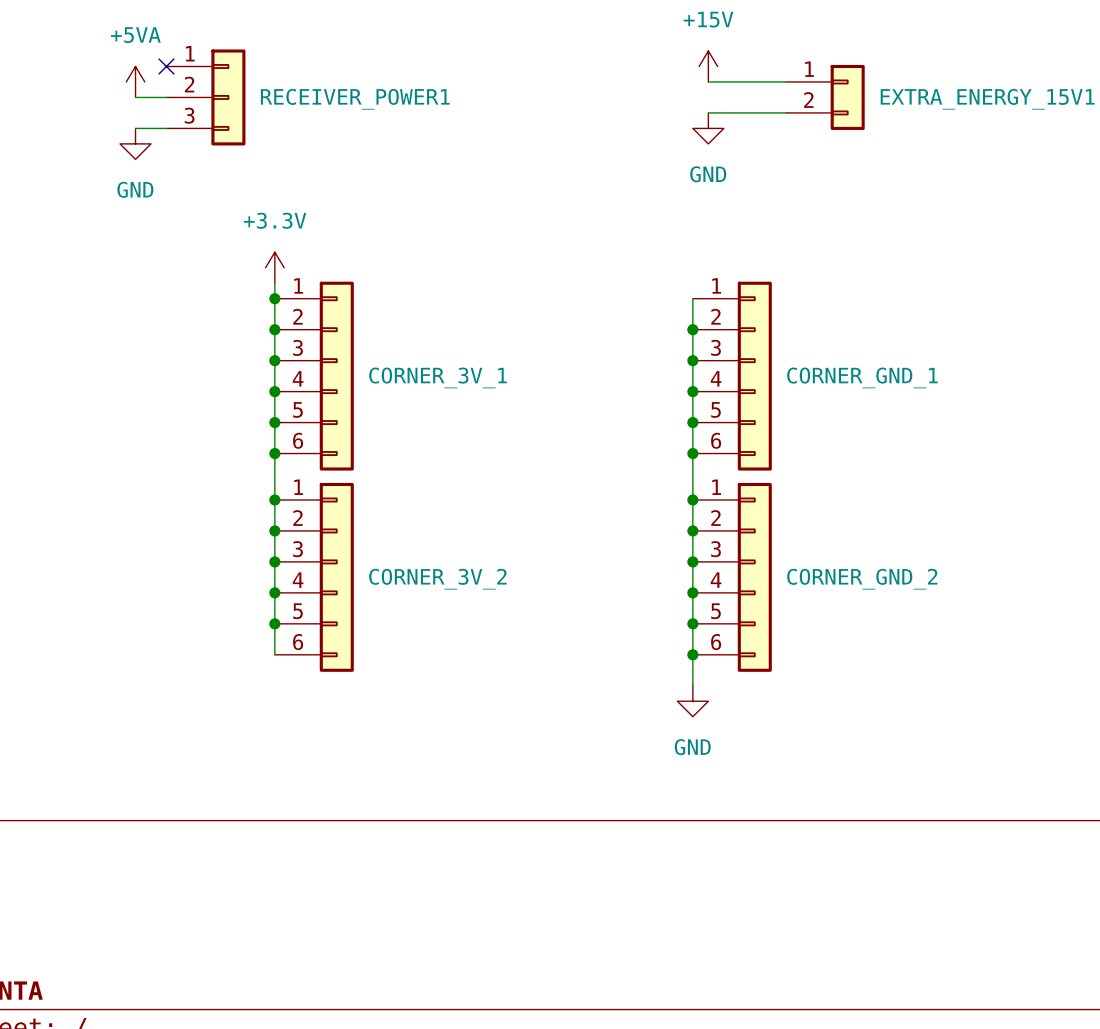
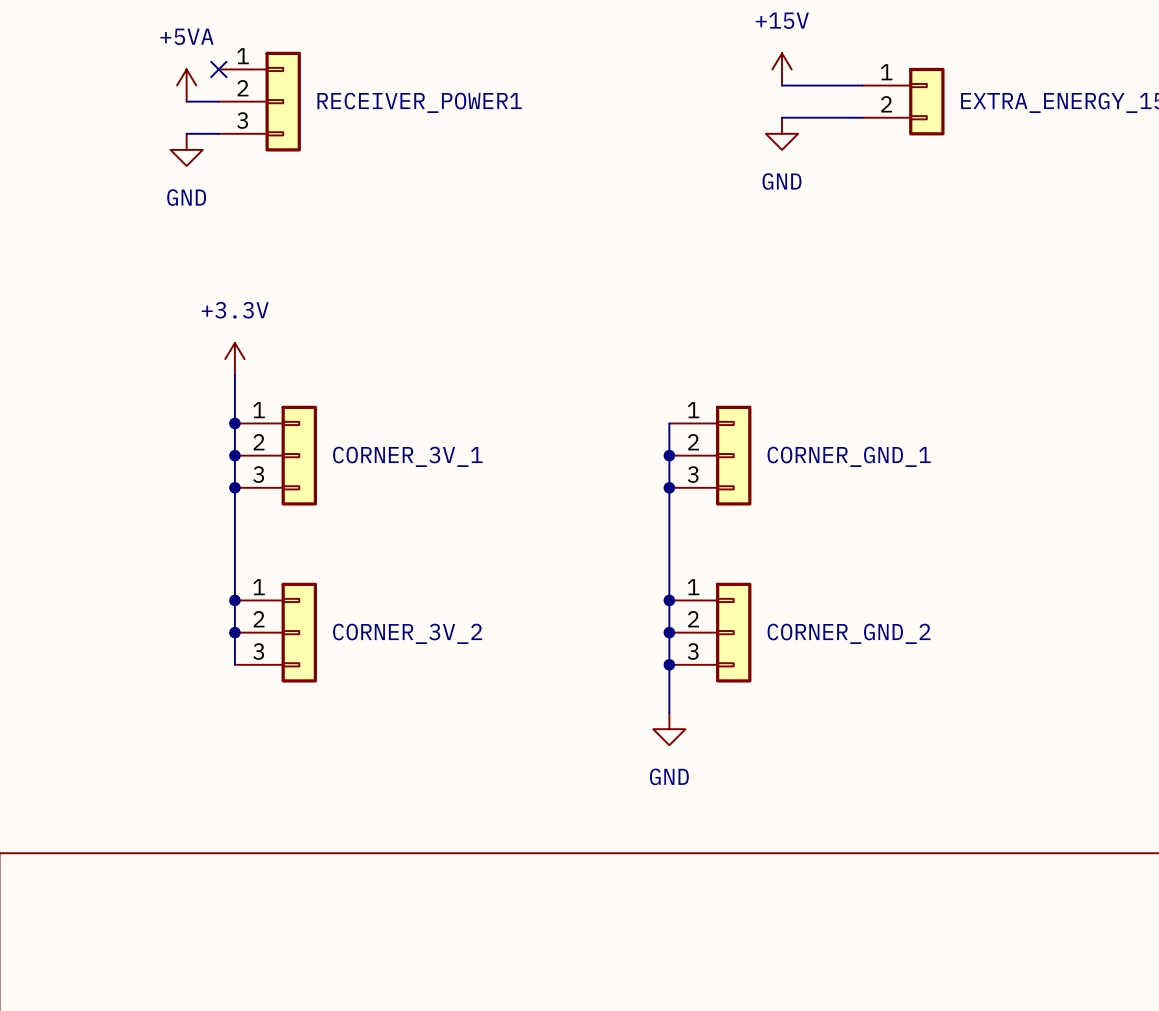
power symbol position: +3.3V (274, 267) -> +3.3V (234, 359)
CORNER_3V_1 symbol: [274, 281, 354, 471] -> [234, 405, 317, 506]
CORNER_GND_1 symbol: [692, 281, 772, 471] -> [669, 405, 752, 506]
wire: (274, 283) (274, 654) -> none
junction: (274, 298) -> none
wire: (692, 298) (692, 685) -> none
junction: (274, 329) -> none
junction: (692, 329) -> none
wire: none -> (234, 375) (234, 664)
junction: (274, 360) -> none
junction: (692, 360) -> none
junction: (274, 391) -> none
junction: (692, 391) -> none
junction: none -> (234, 423)
wire: none -> (669, 423) (669, 713)
junction: (274, 422) -> none
junction: (692, 422) -> none
junction: none -> (234, 455)
junction: none -> (669, 455)
junction: (274, 453) -> none
junction: (692, 453) -> none
junction: none -> (234, 487)
junction: none -> (669, 487)
CORNER_3V_2 symbol: [274, 482, 354, 672] -> [234, 582, 317, 683]
CORNER_GND_2 symbol: [692, 482, 772, 672] -> [669, 582, 752, 683]
junction: (274, 499) -> none
junction: (692, 499) -> none
junction: (274, 530) -> none
junction: (692, 530) -> none
junction: (274, 561) -> none
junction: (692, 561) -> none
junction: none -> (234, 600)
junction: none -> (669, 600)
junction: (274, 592) -> none
junction: (692, 592) -> none
junction: none -> (234, 632)
junction: none -> (669, 632)
junction: (274, 623) -> none
junction: (692, 623) -> none
junction: none -> (669, 664)
junction: (692, 654) -> none
power symbol position: GND (692, 701) -> GND (669, 729)

